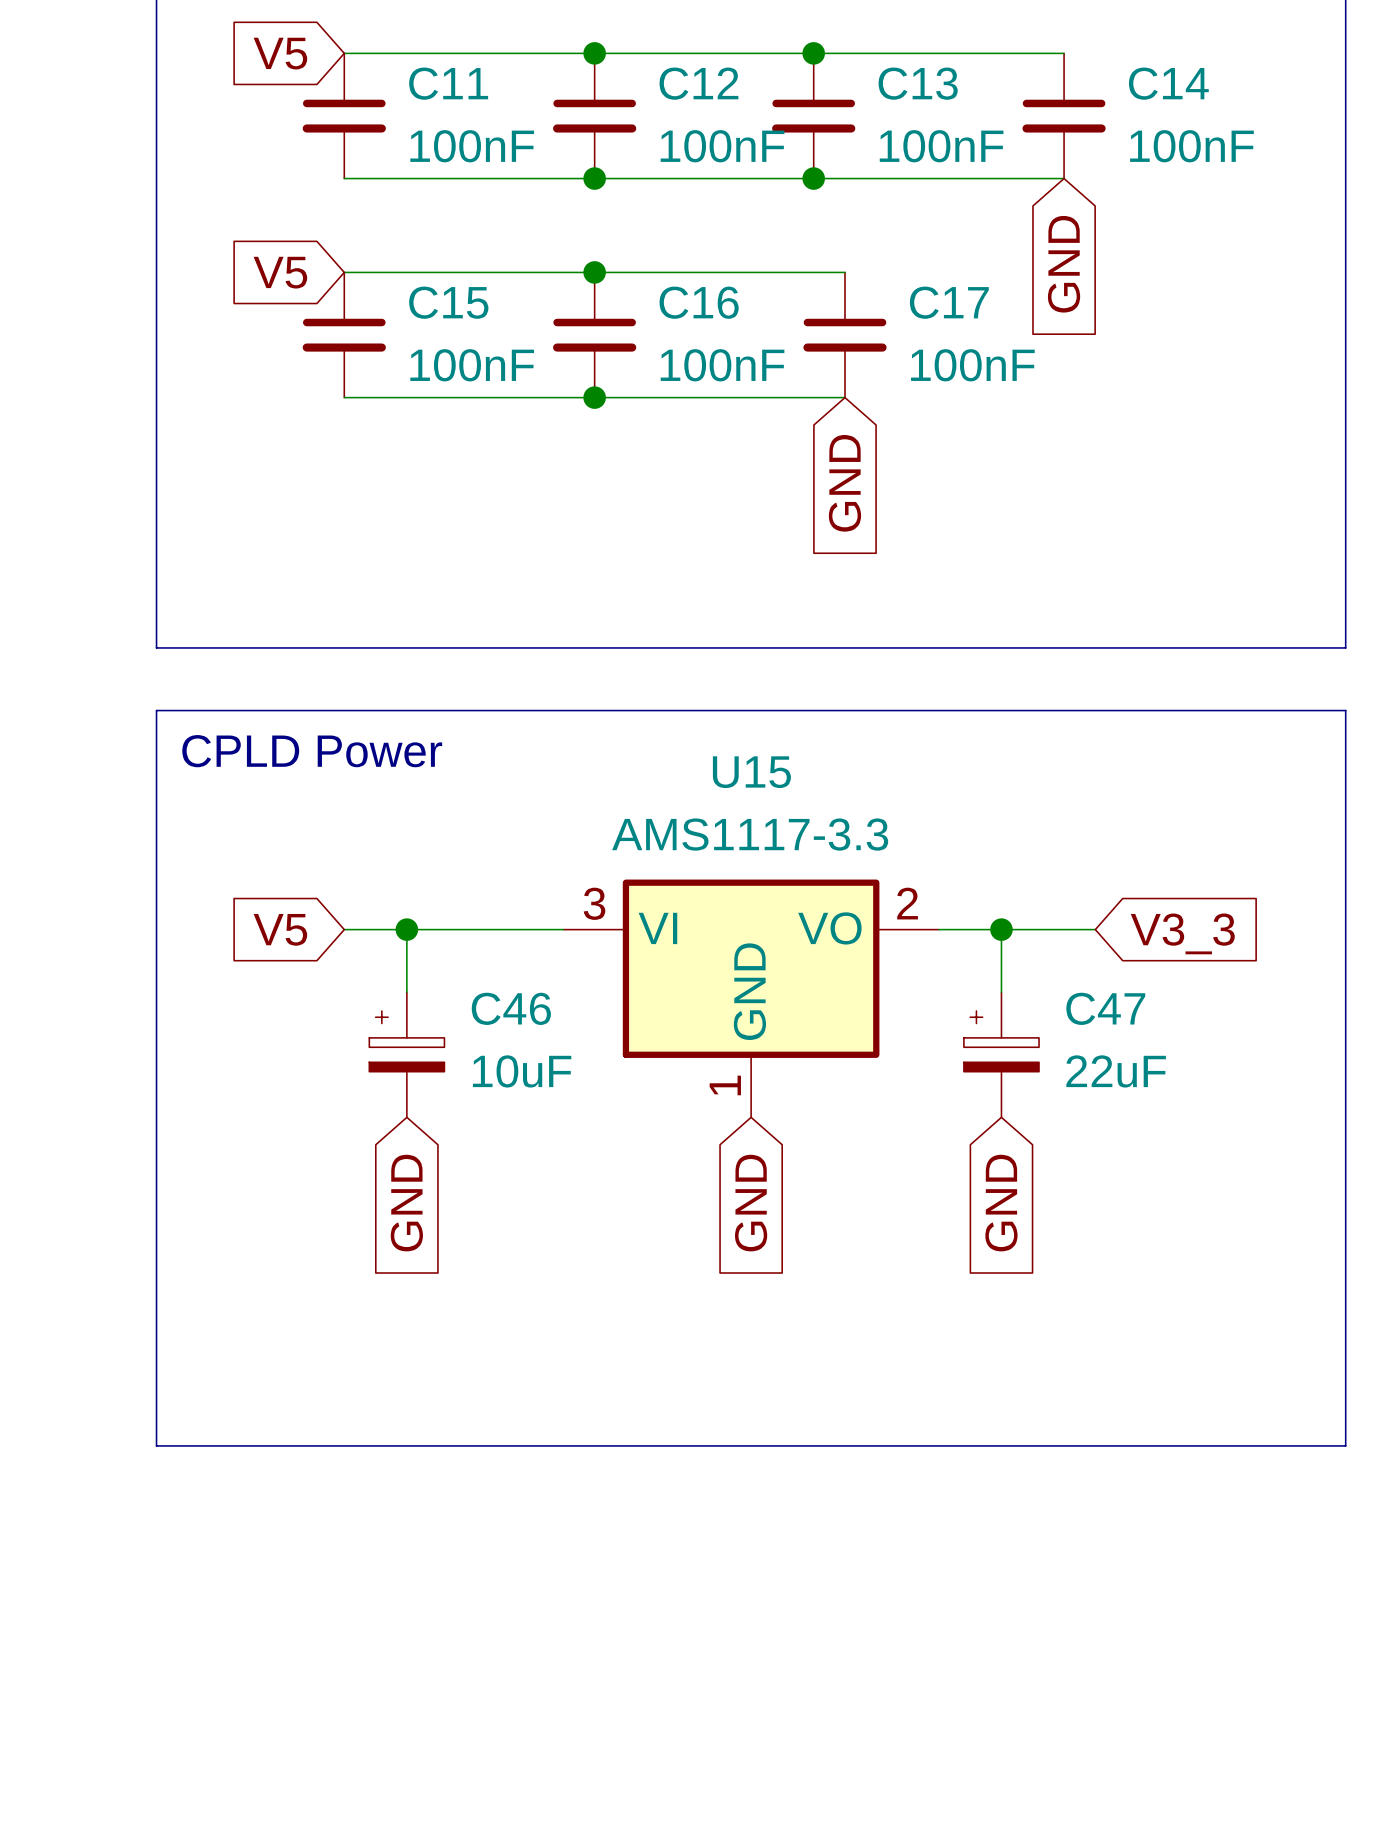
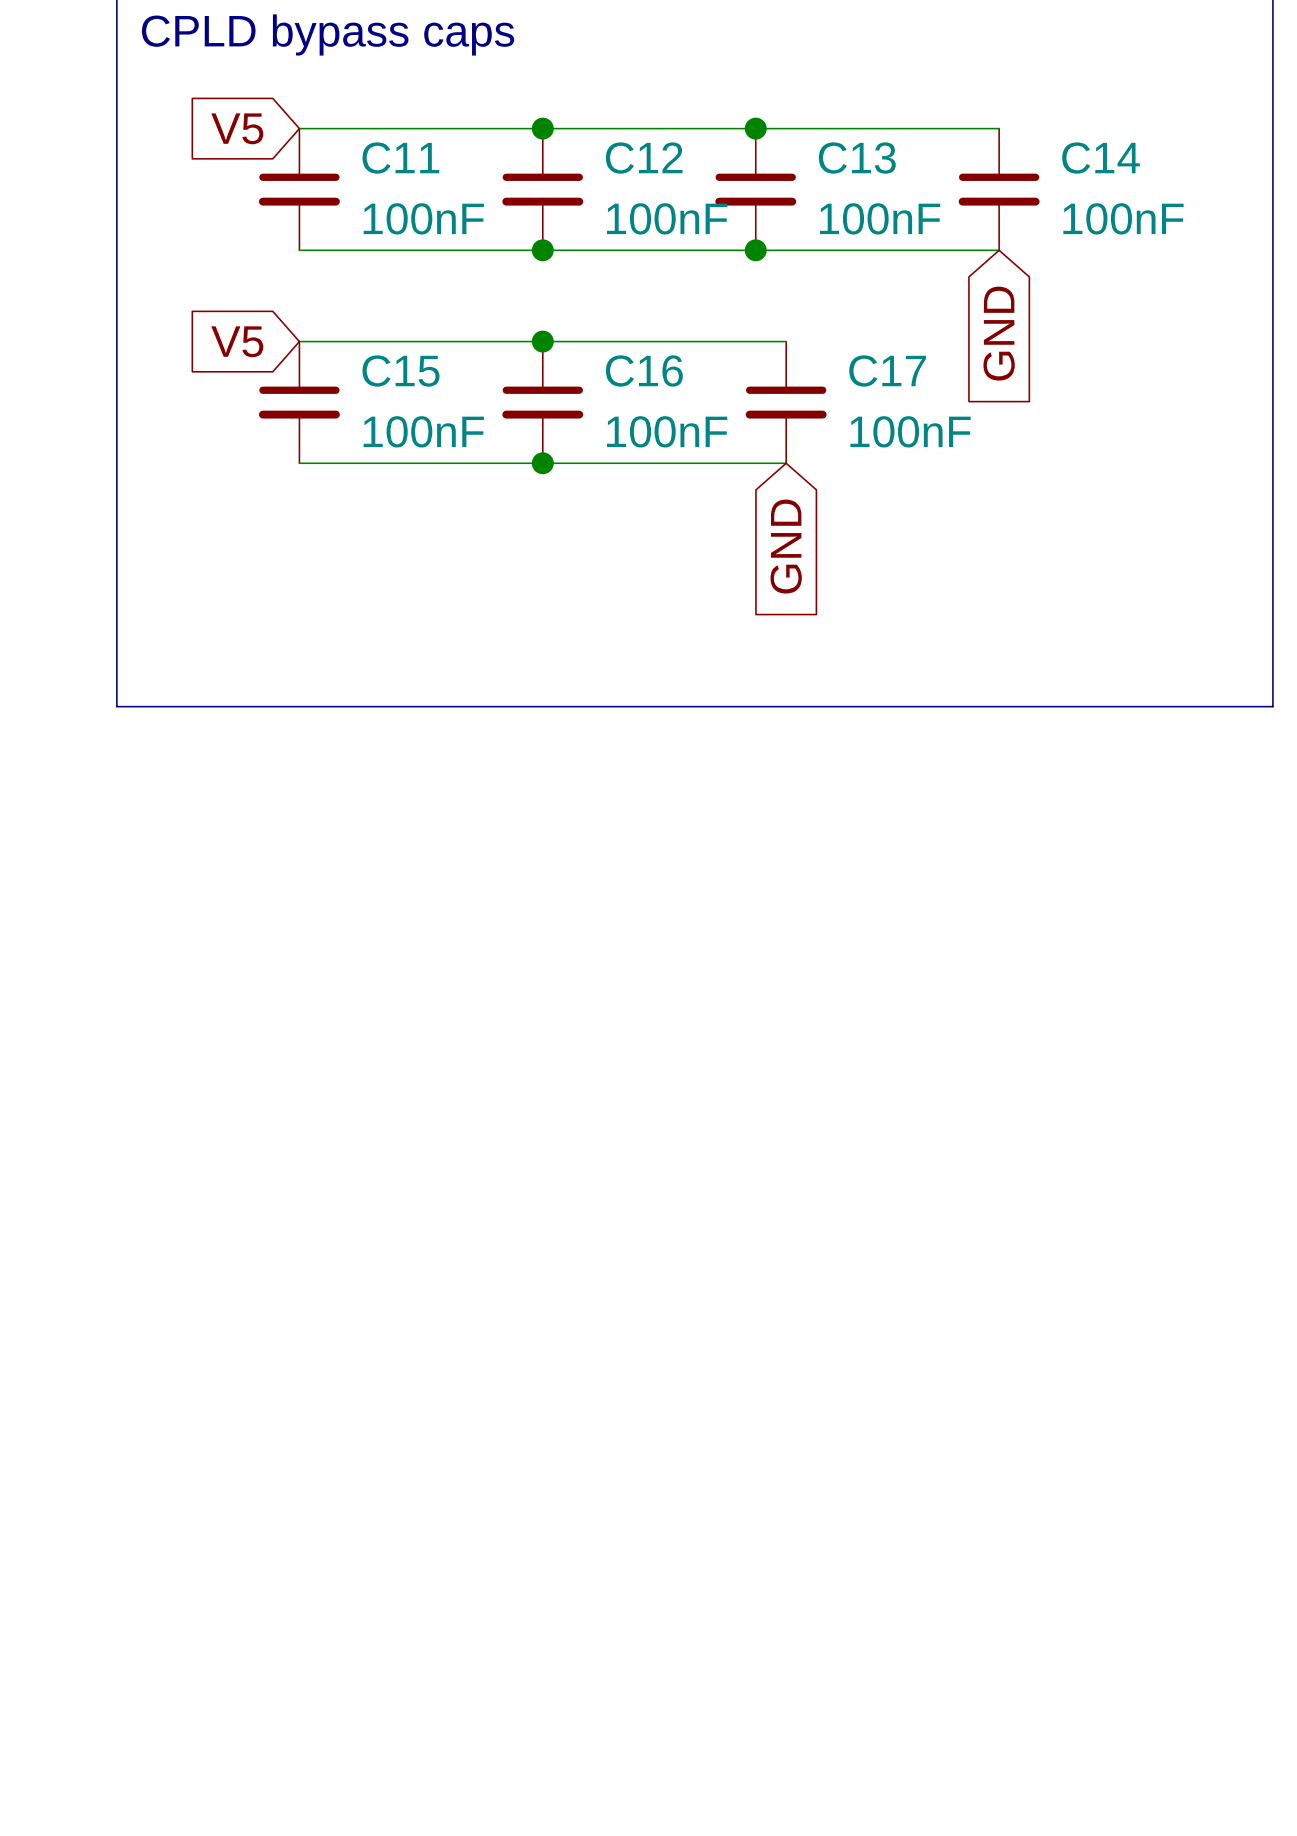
line: (156, 710) (156, 1445) (1345, 1445) (1345, 710) (156, 710) -> none
text: CPLD Power (312, 751) -> none
global label: V5 (280, 929) -> none
wire: (344, 929) (563, 929) -> none
wire: (406, 929) (406, 992) -> none
junction: (406, 929) -> none
wire: (938, 929) (1095, 929) -> none
wire: (1001, 929) (1001, 992) -> none
junction: (1001, 929) -> none
global label: V3_3 (1182, 933) -> none
U15: AMS1117-3.3 (751, 998) -> none
C46: 10uF (406, 1054) -> none
C47: 22uF (1001, 1054) -> none
global label: GND (406, 1203) -> none
global label: GND (751, 1203) -> none
global label: GND (1001, 1203) -> none

